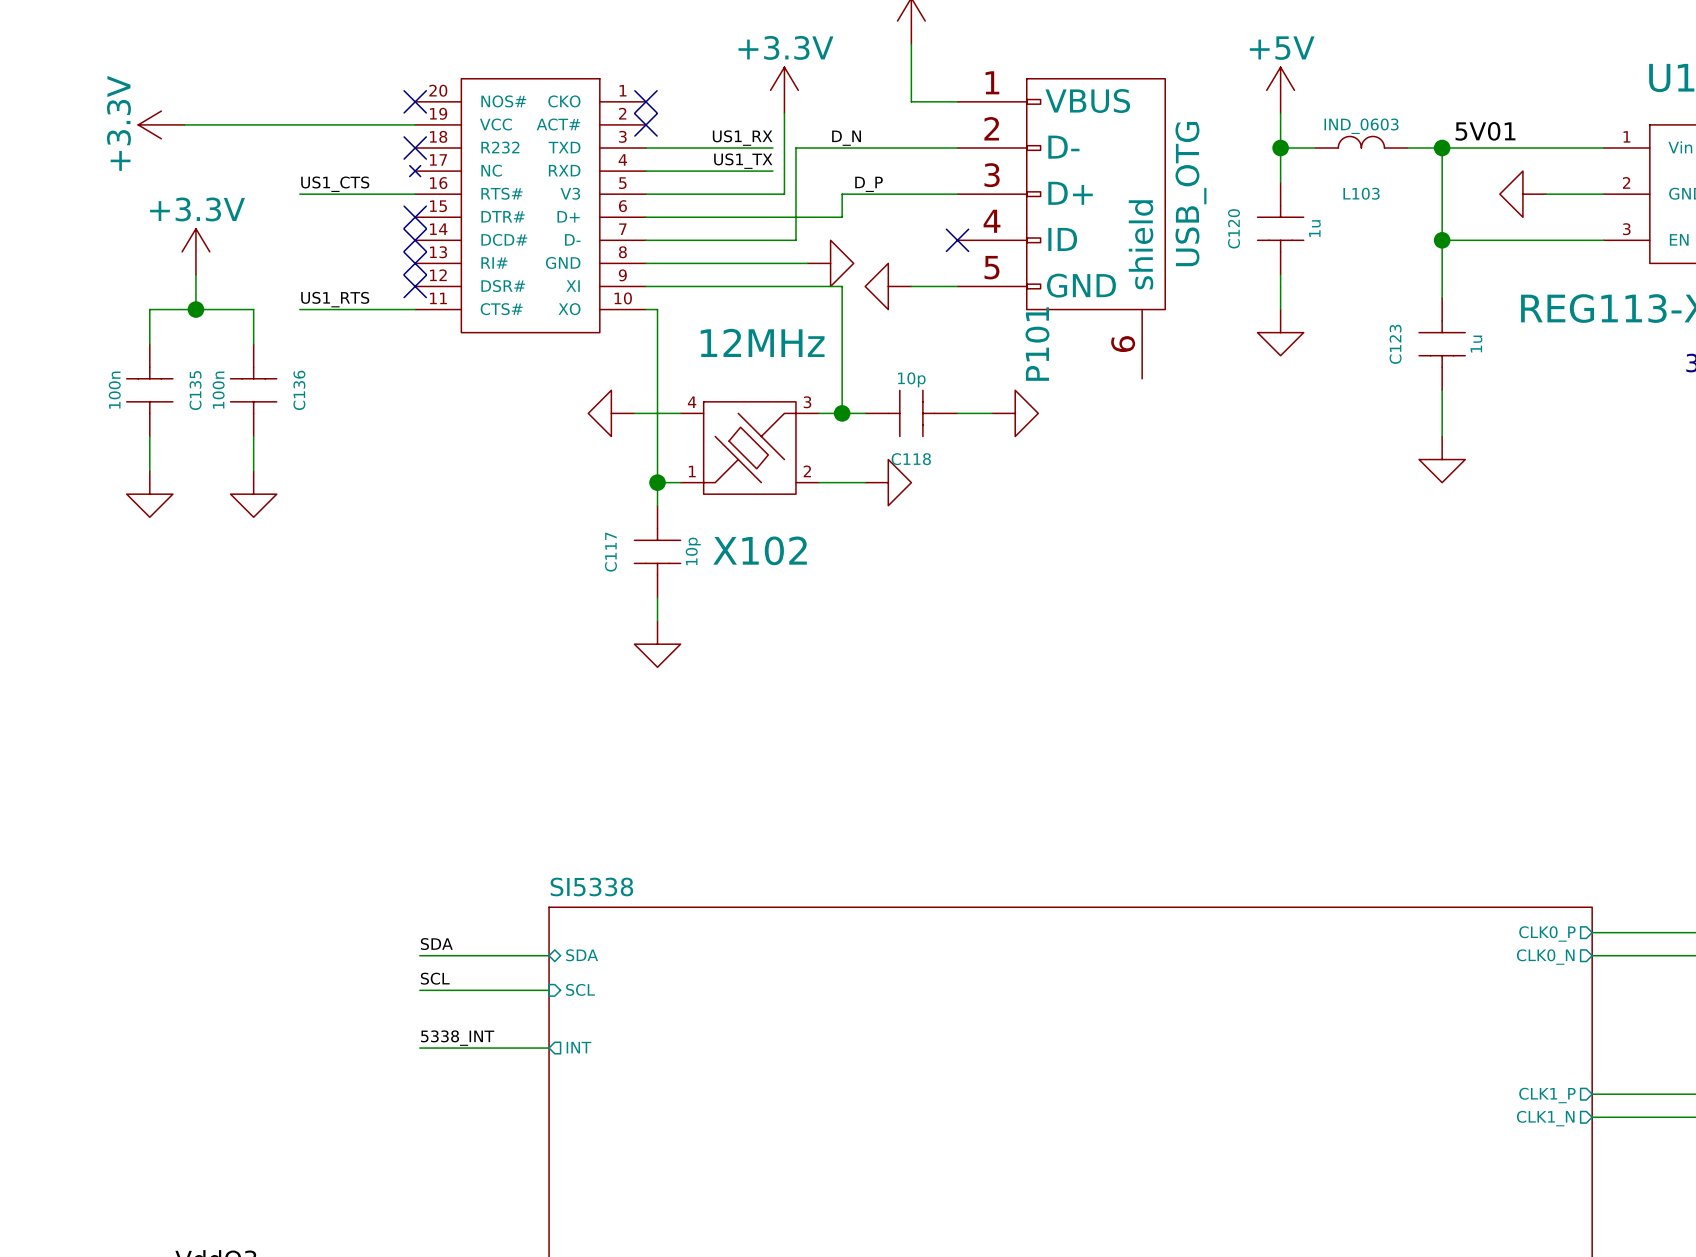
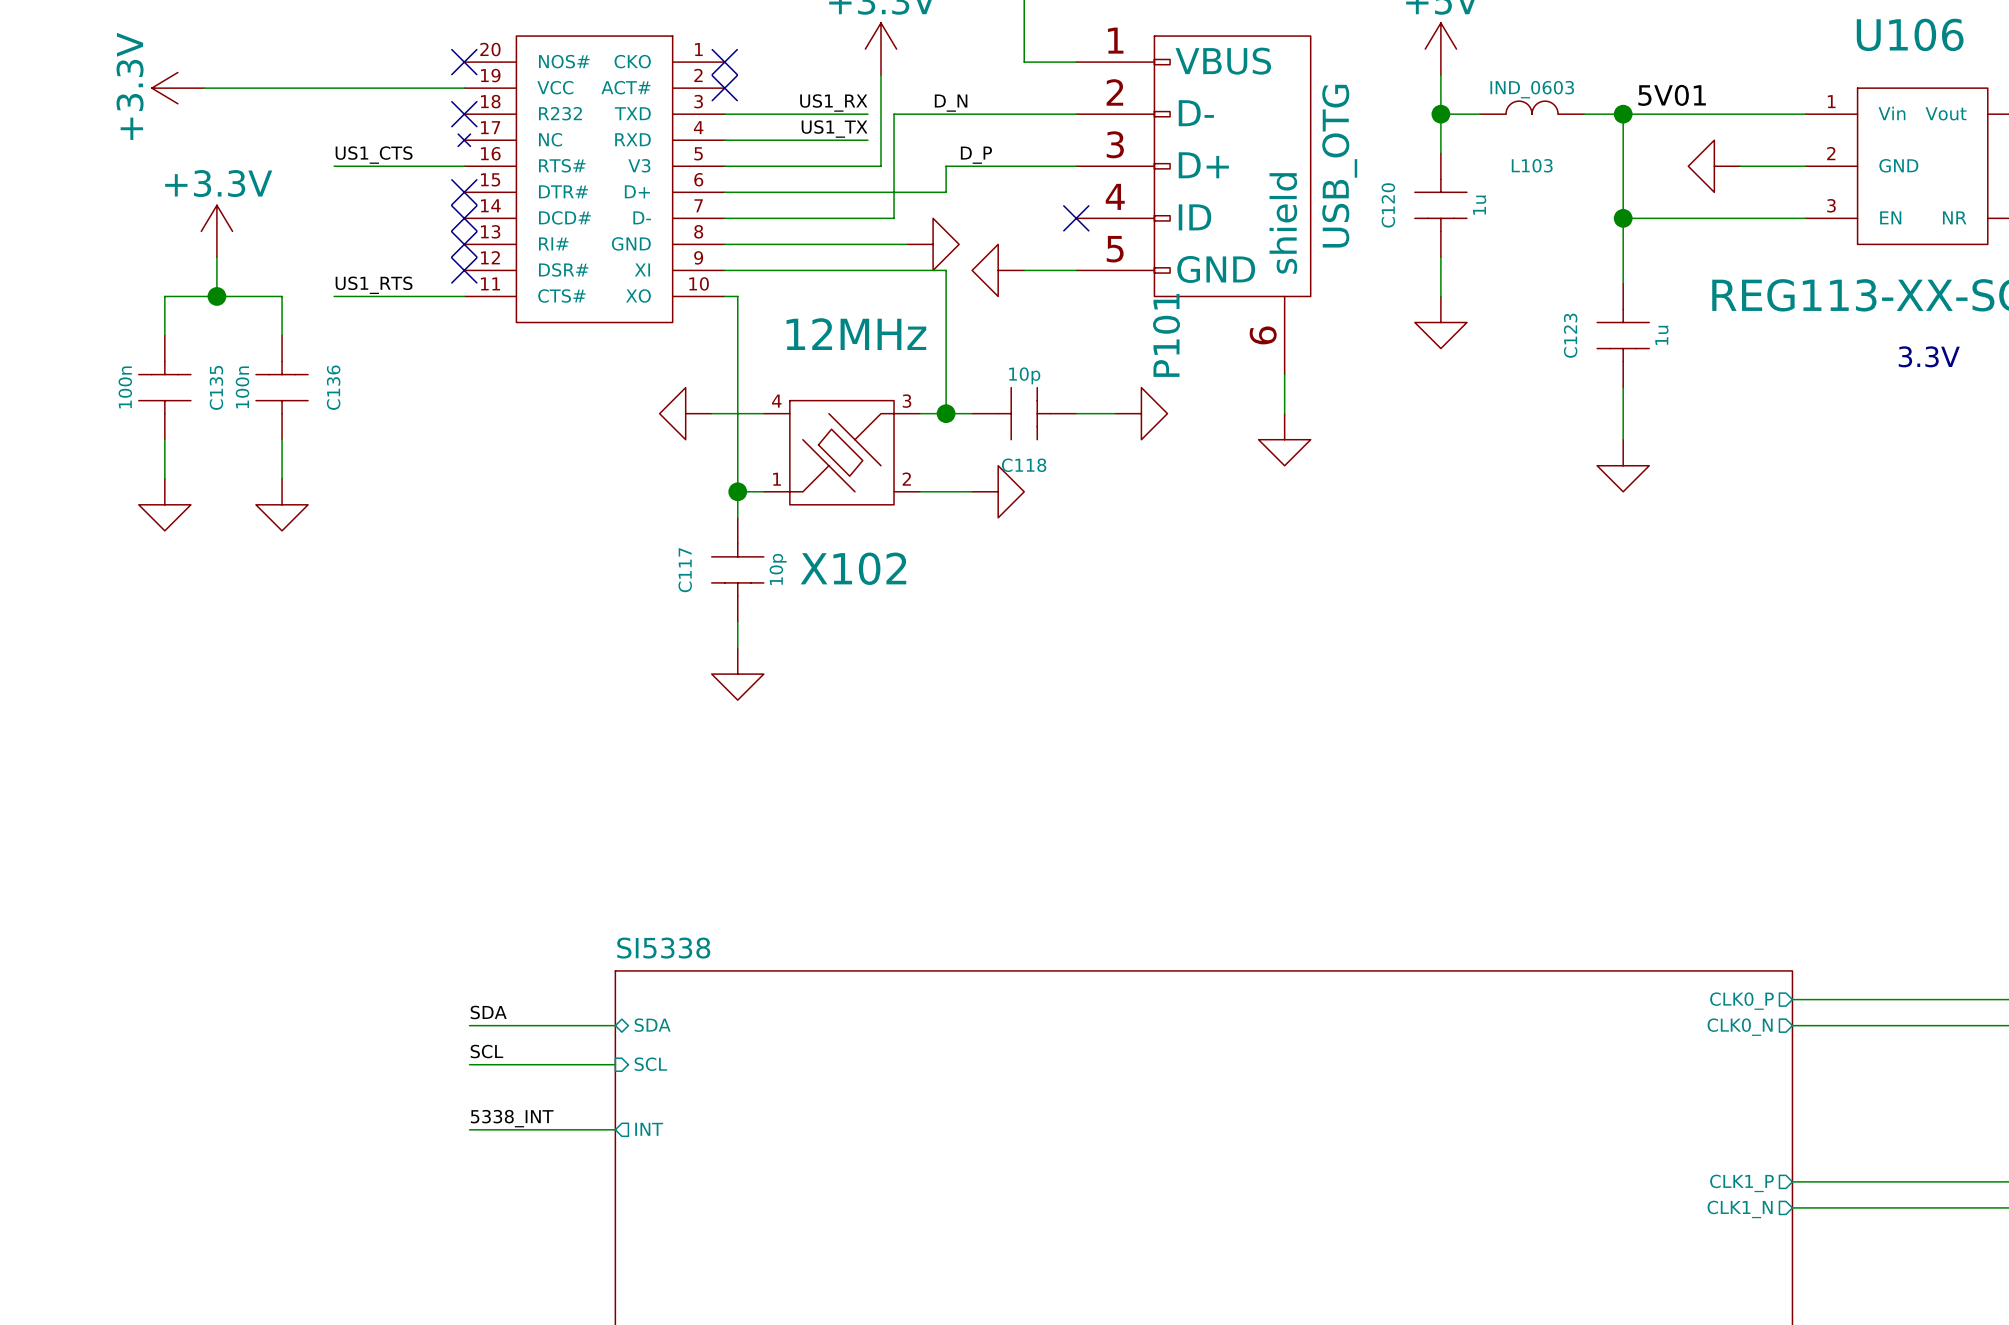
wire: none -> (1284, 374) (1284, 413)
power symbol: none -> (1284, 439)

